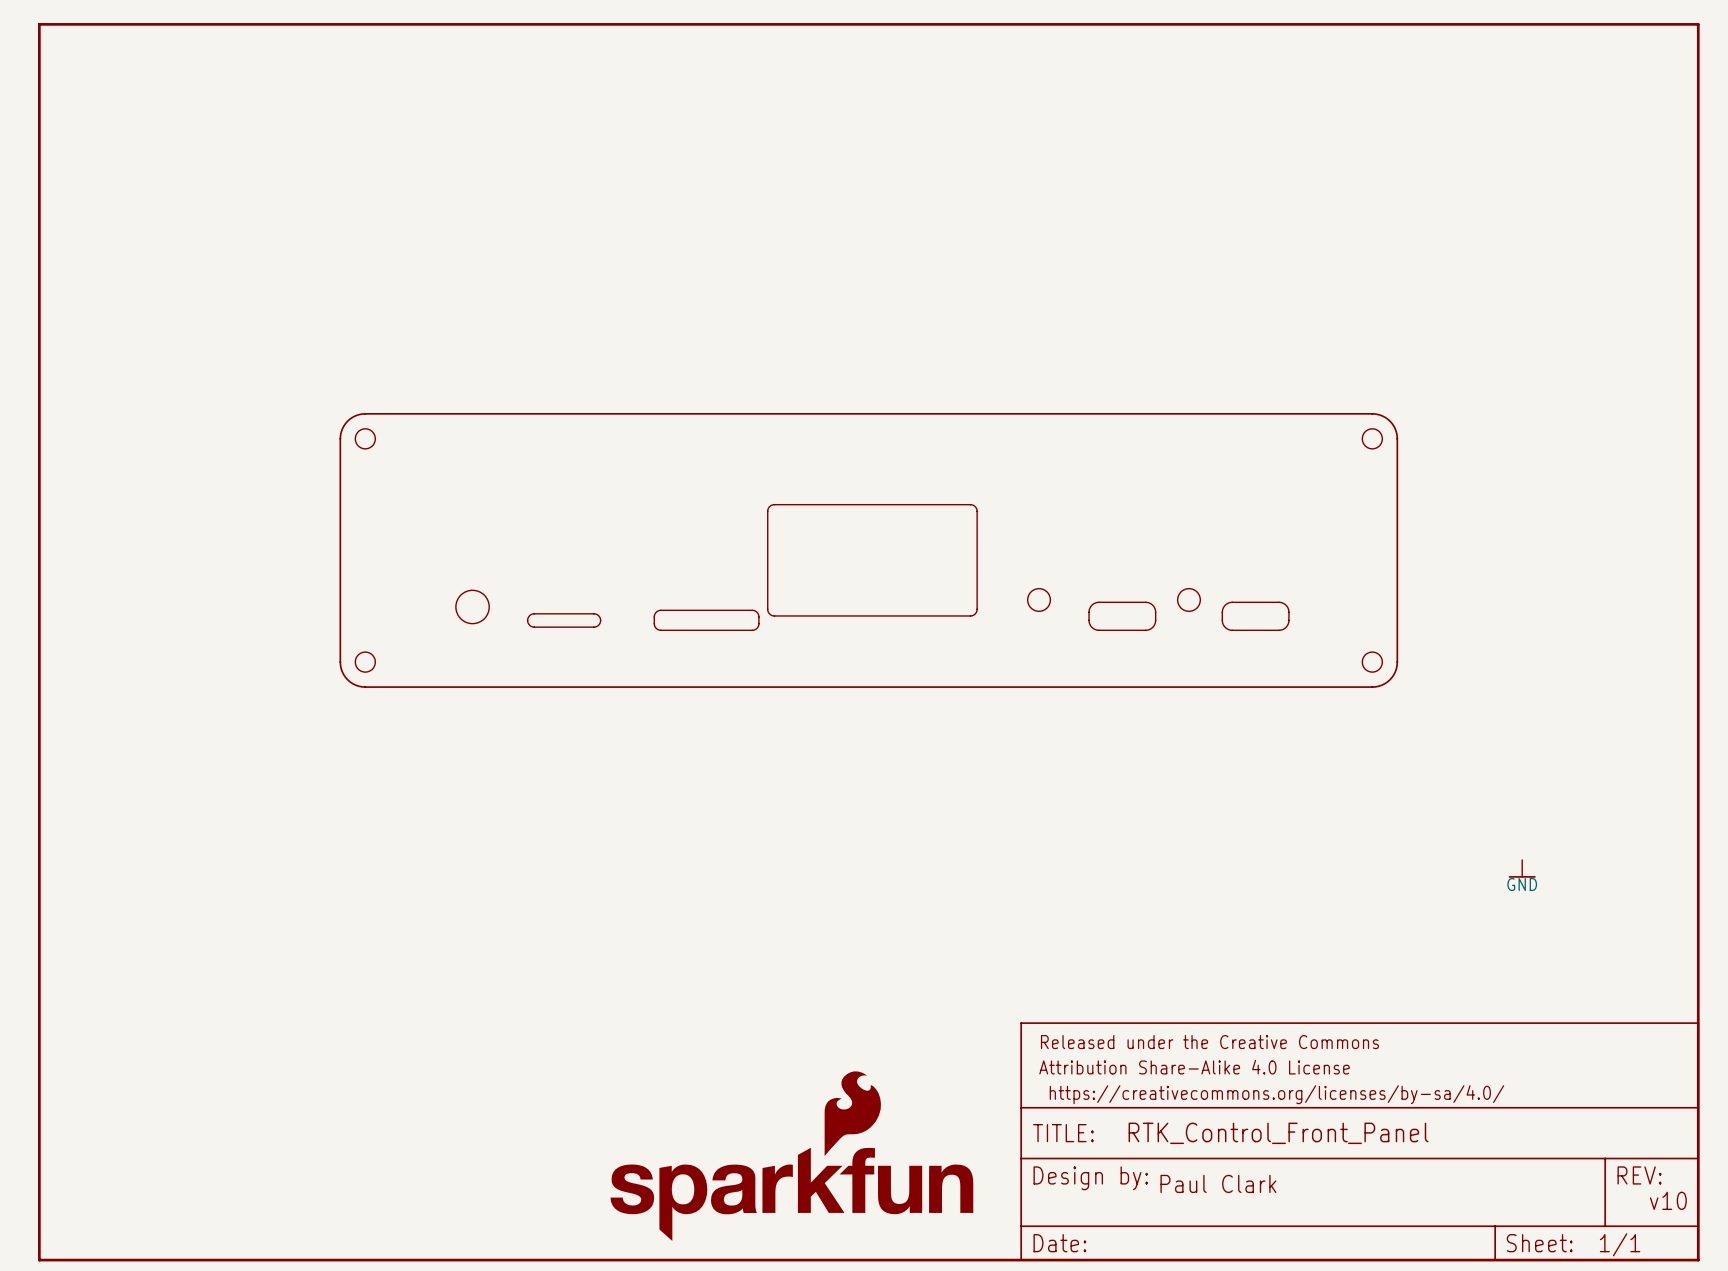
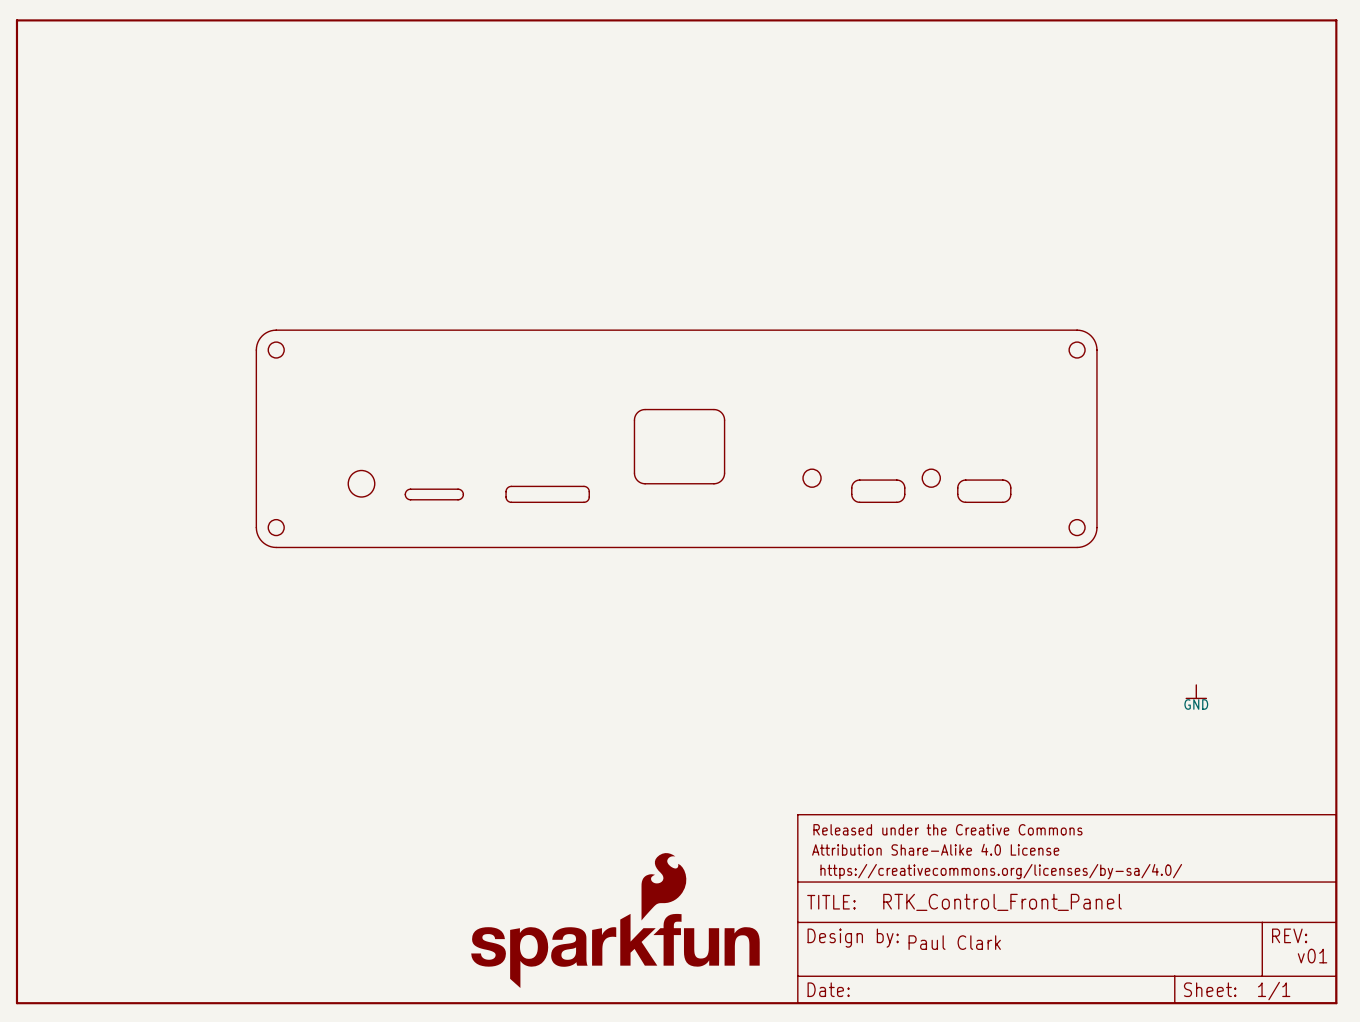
part symbol: [767, 504, 978, 617] -> [633, 409, 726, 485]
text: v10 (1668, 1200) -> v01 (1312, 956)

